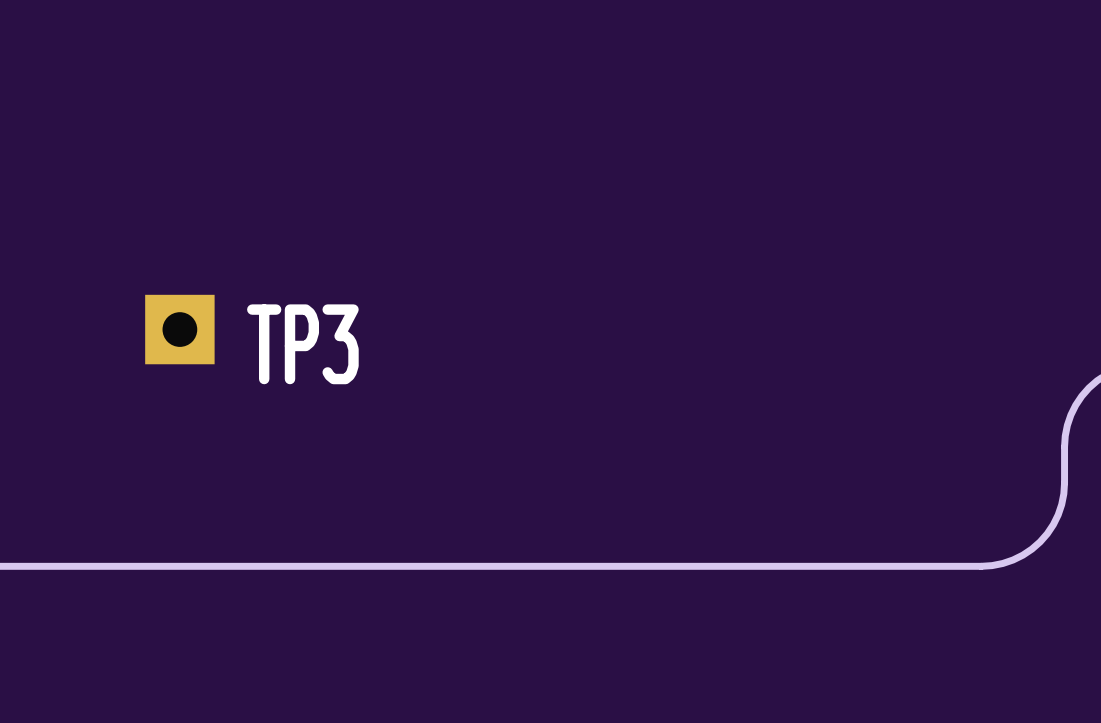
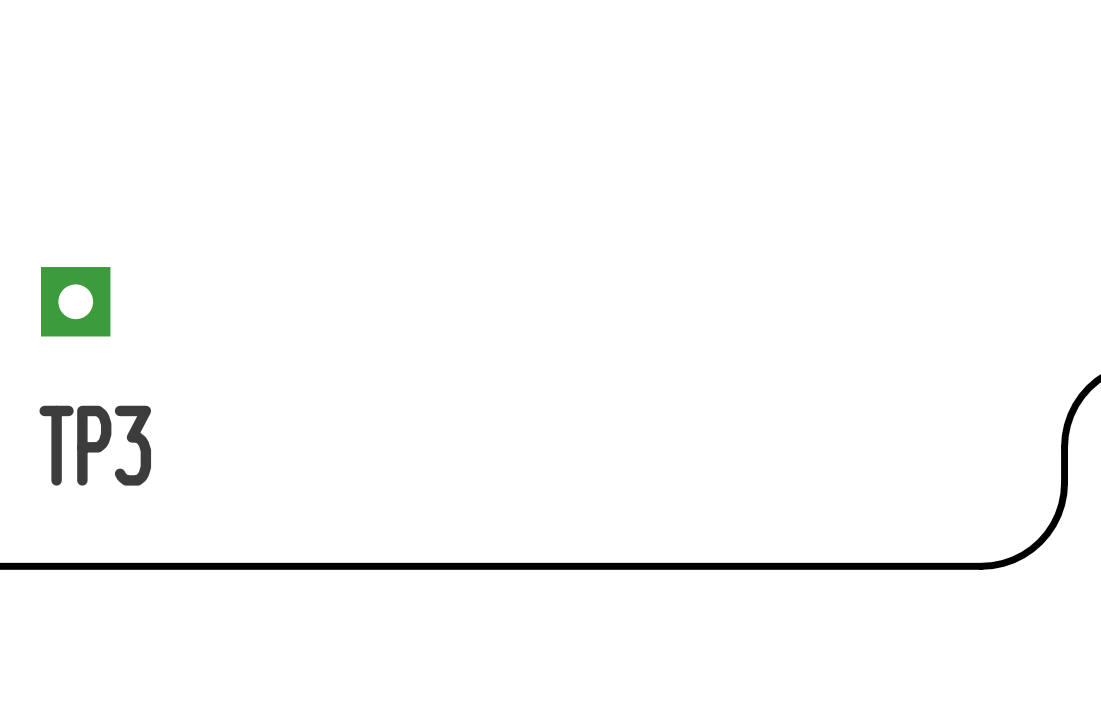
TP3 position: (179, 329) -> (75, 301)
TP3 name position: TP3 (302, 344) -> TP3 (95, 445)

